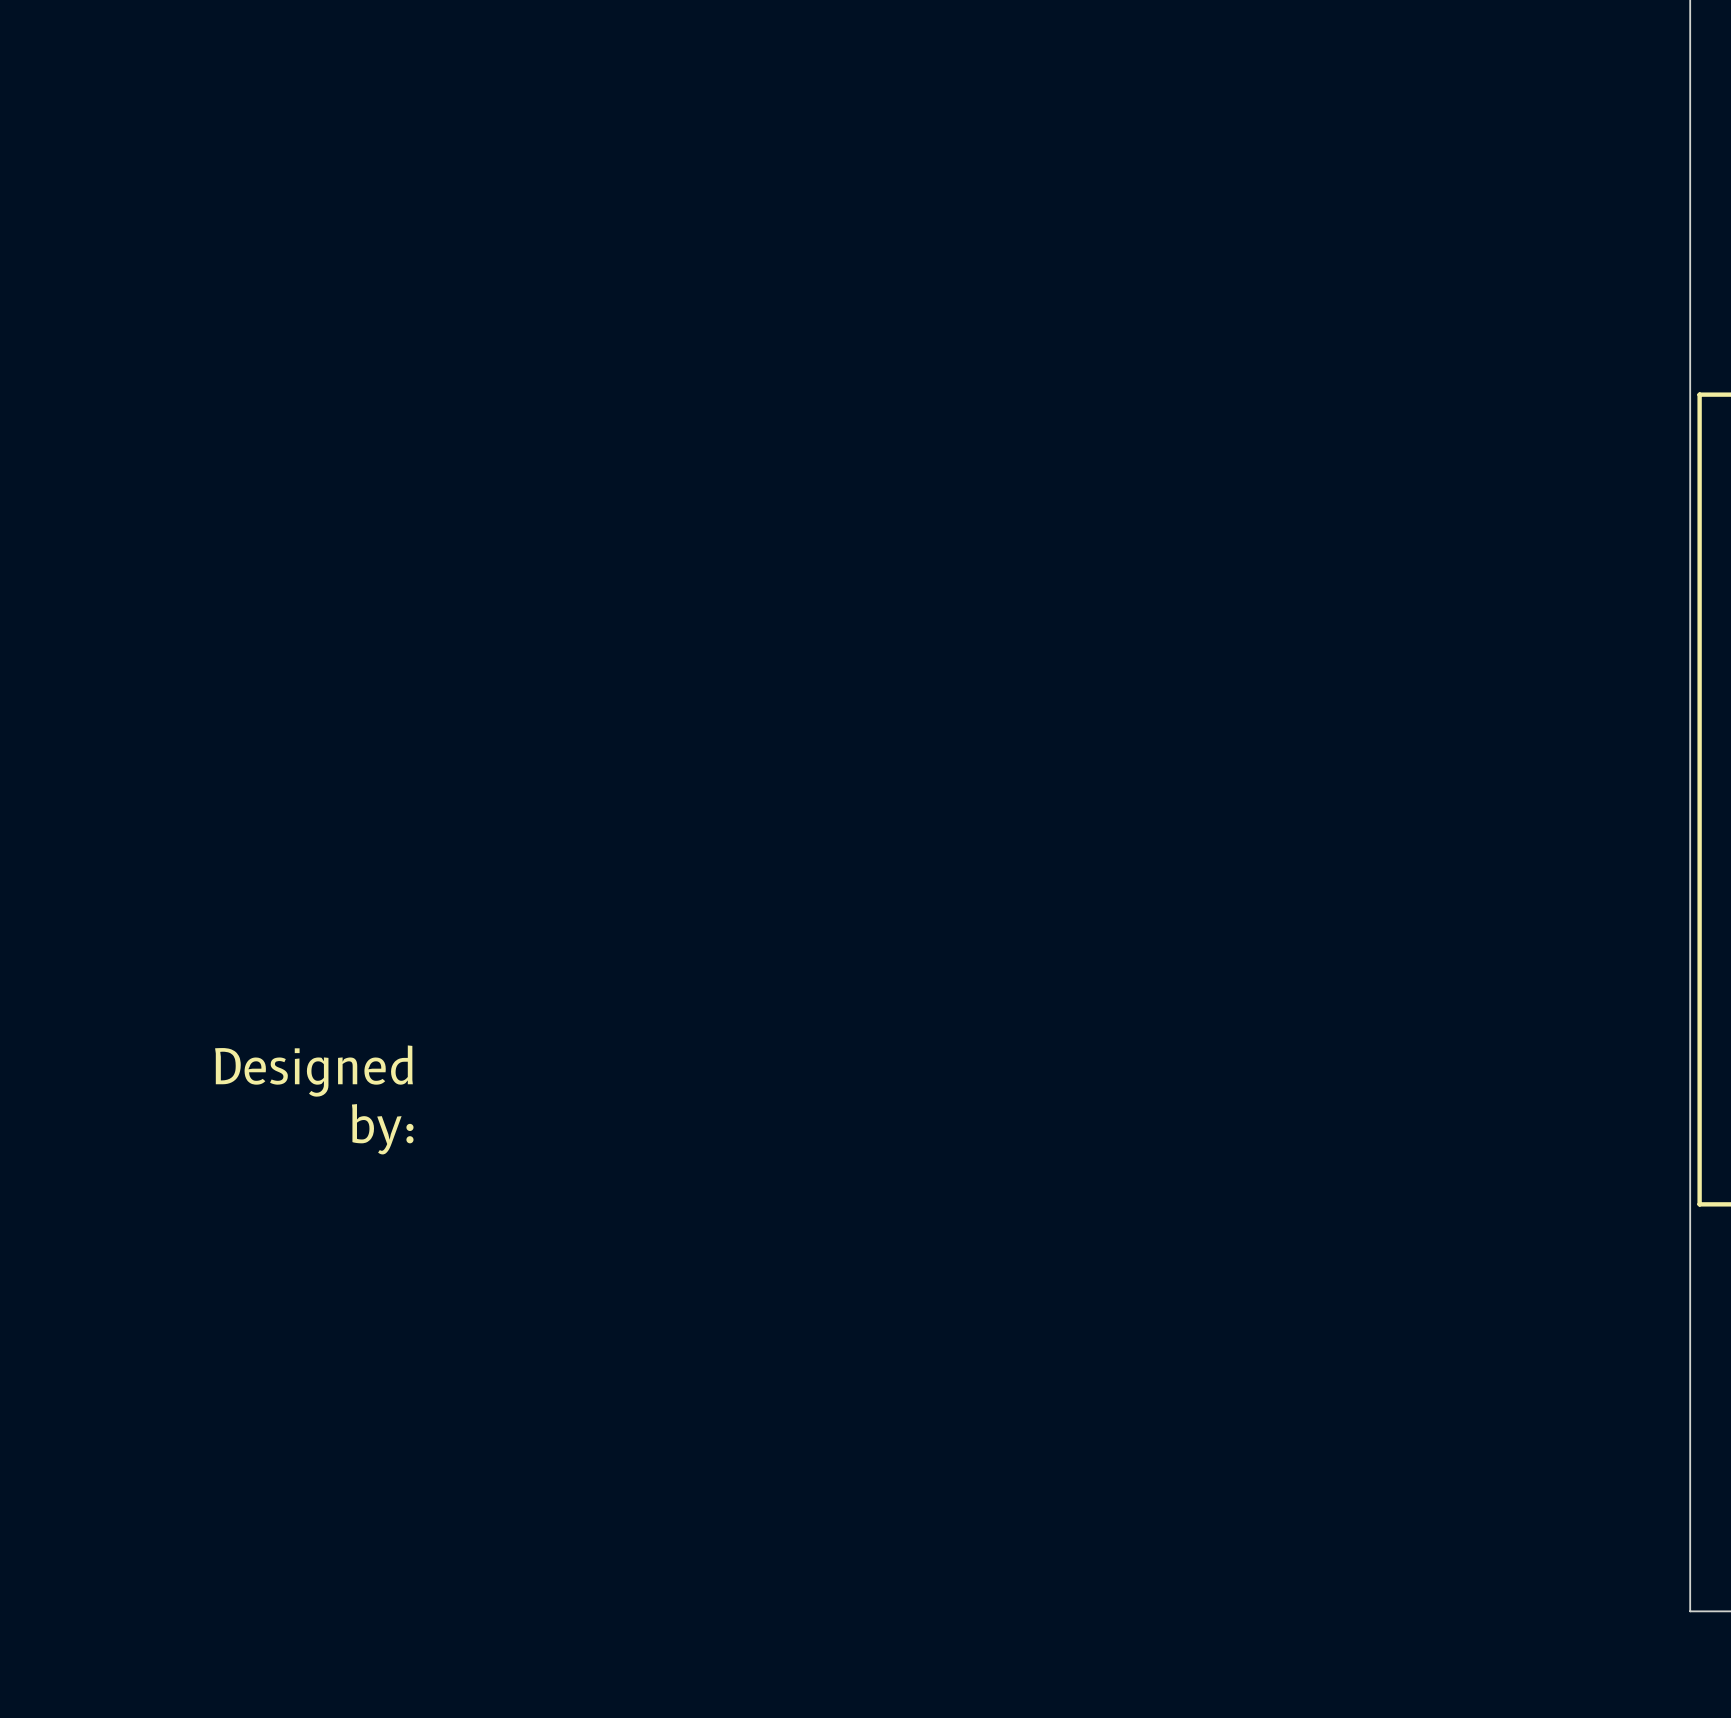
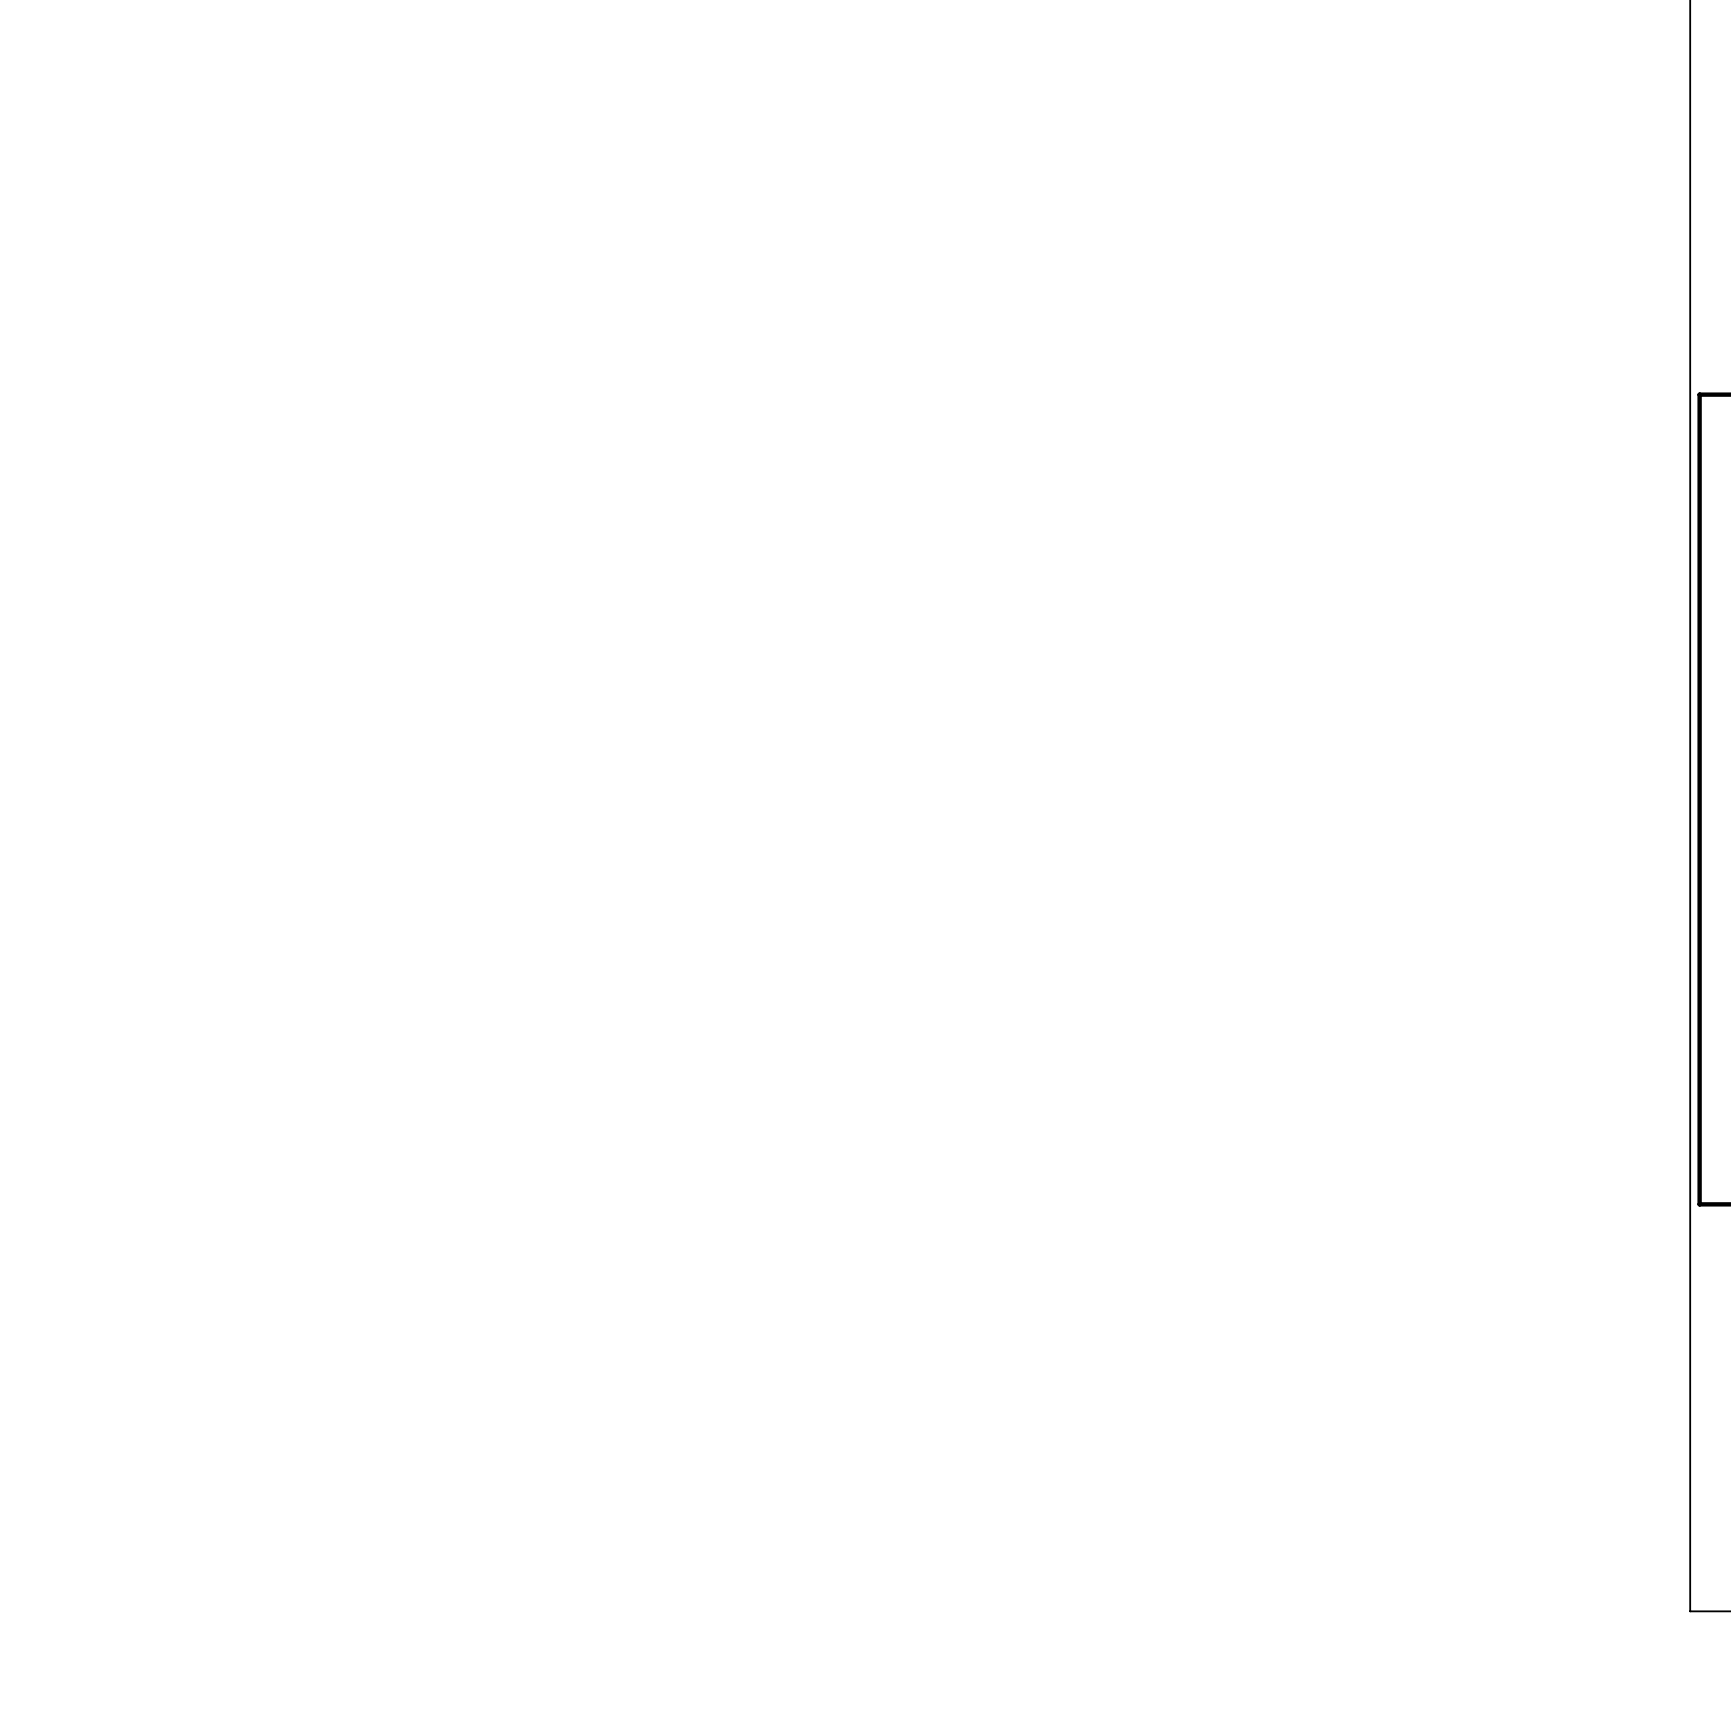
text: Designed (313, 1071) -> none
text: by: (382, 1129) -> none

